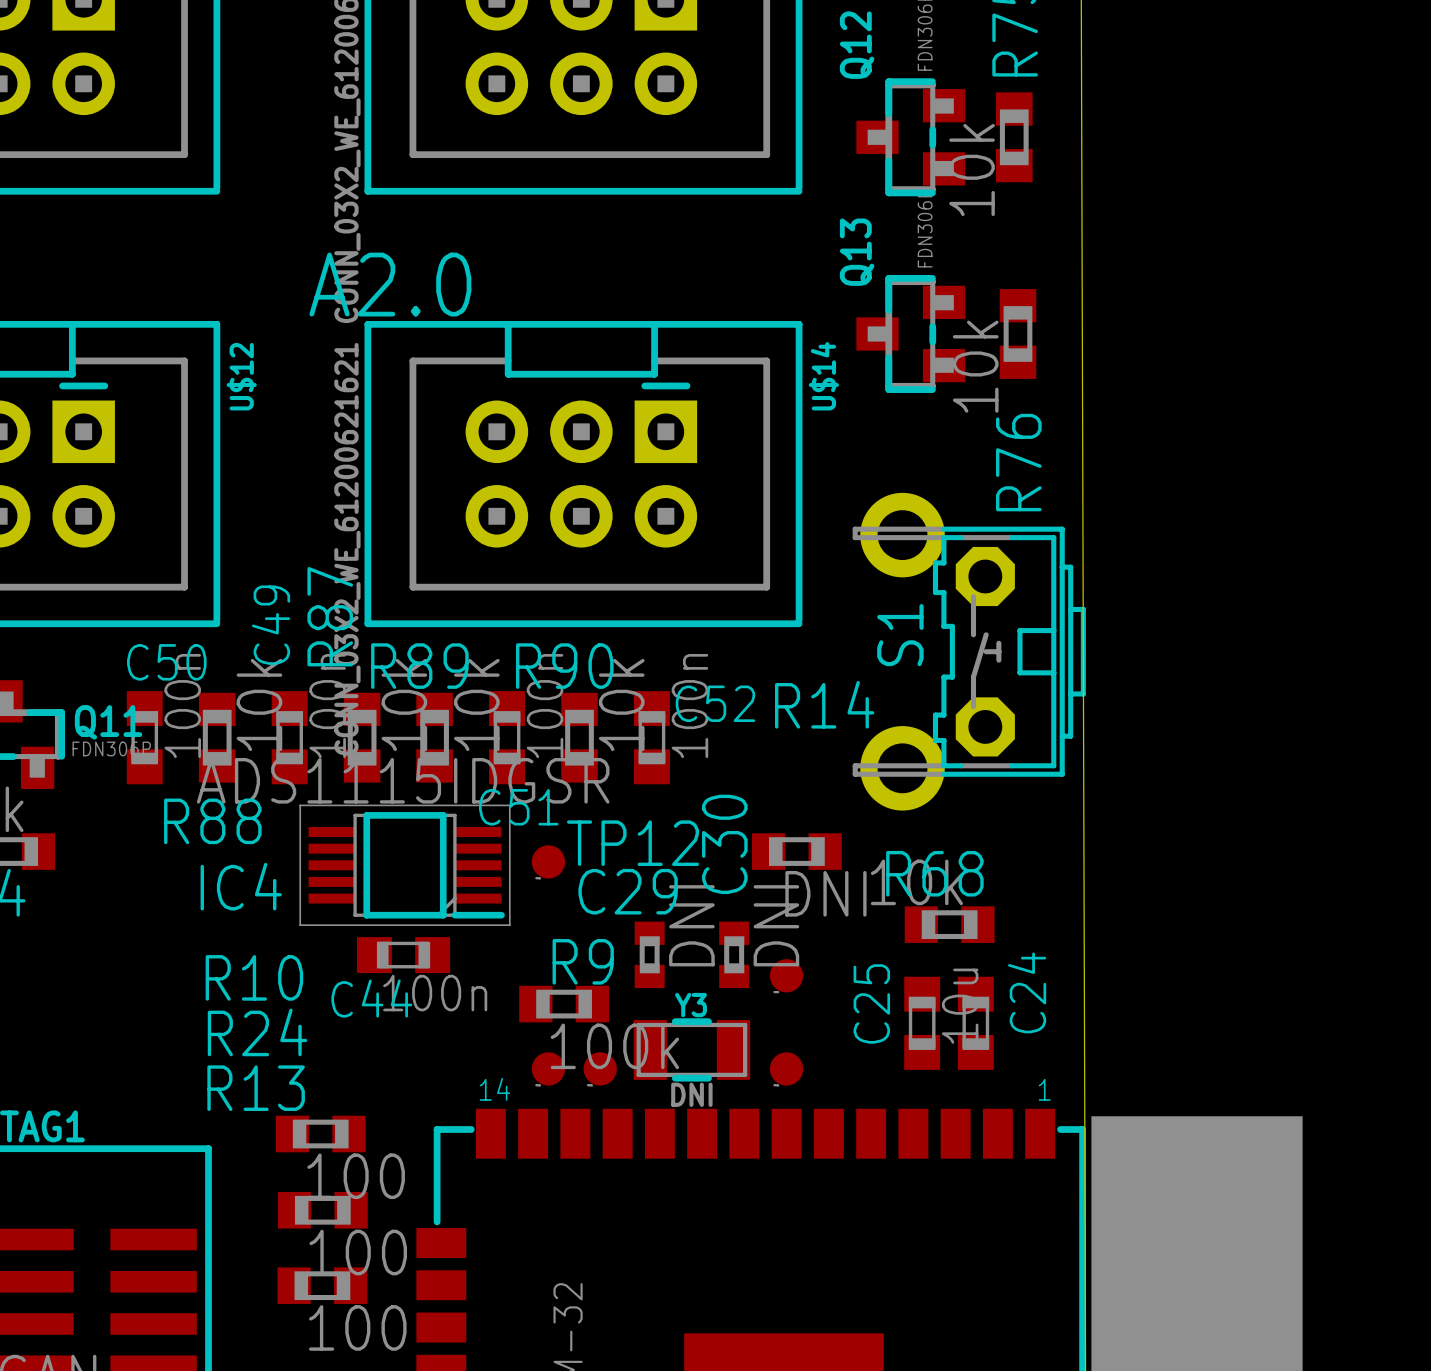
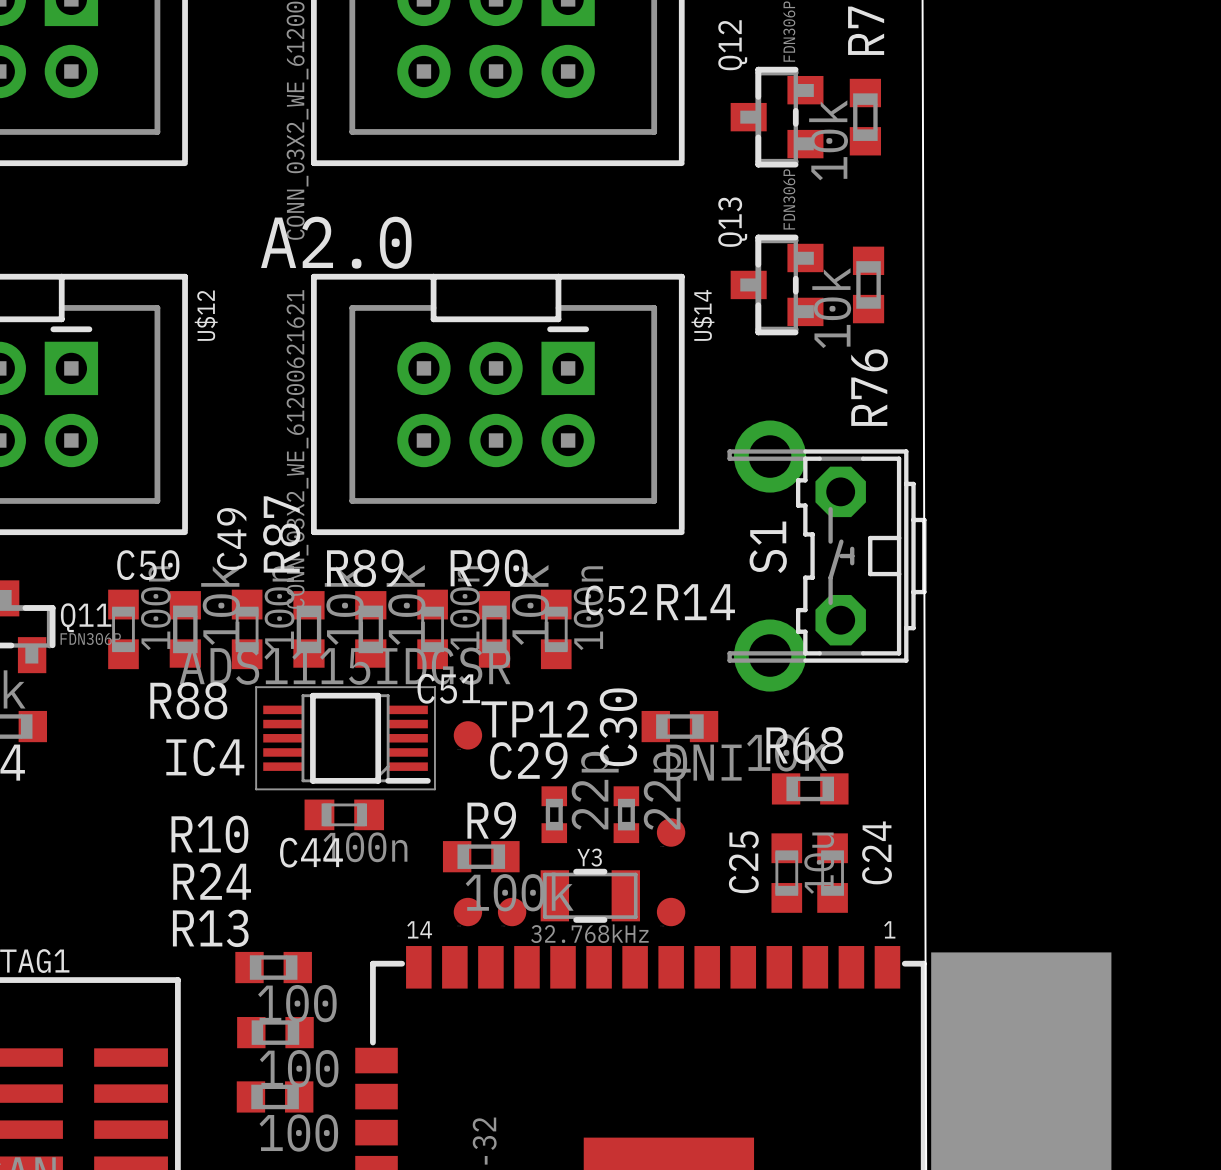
C29 value: DNI (691, 925) -> 22p (595, 790)
C30 value: DNI (776, 925) -> 22p (667, 790)
Y3 value: DNI (691, 1094) -> 32.768kHz (589, 933)

